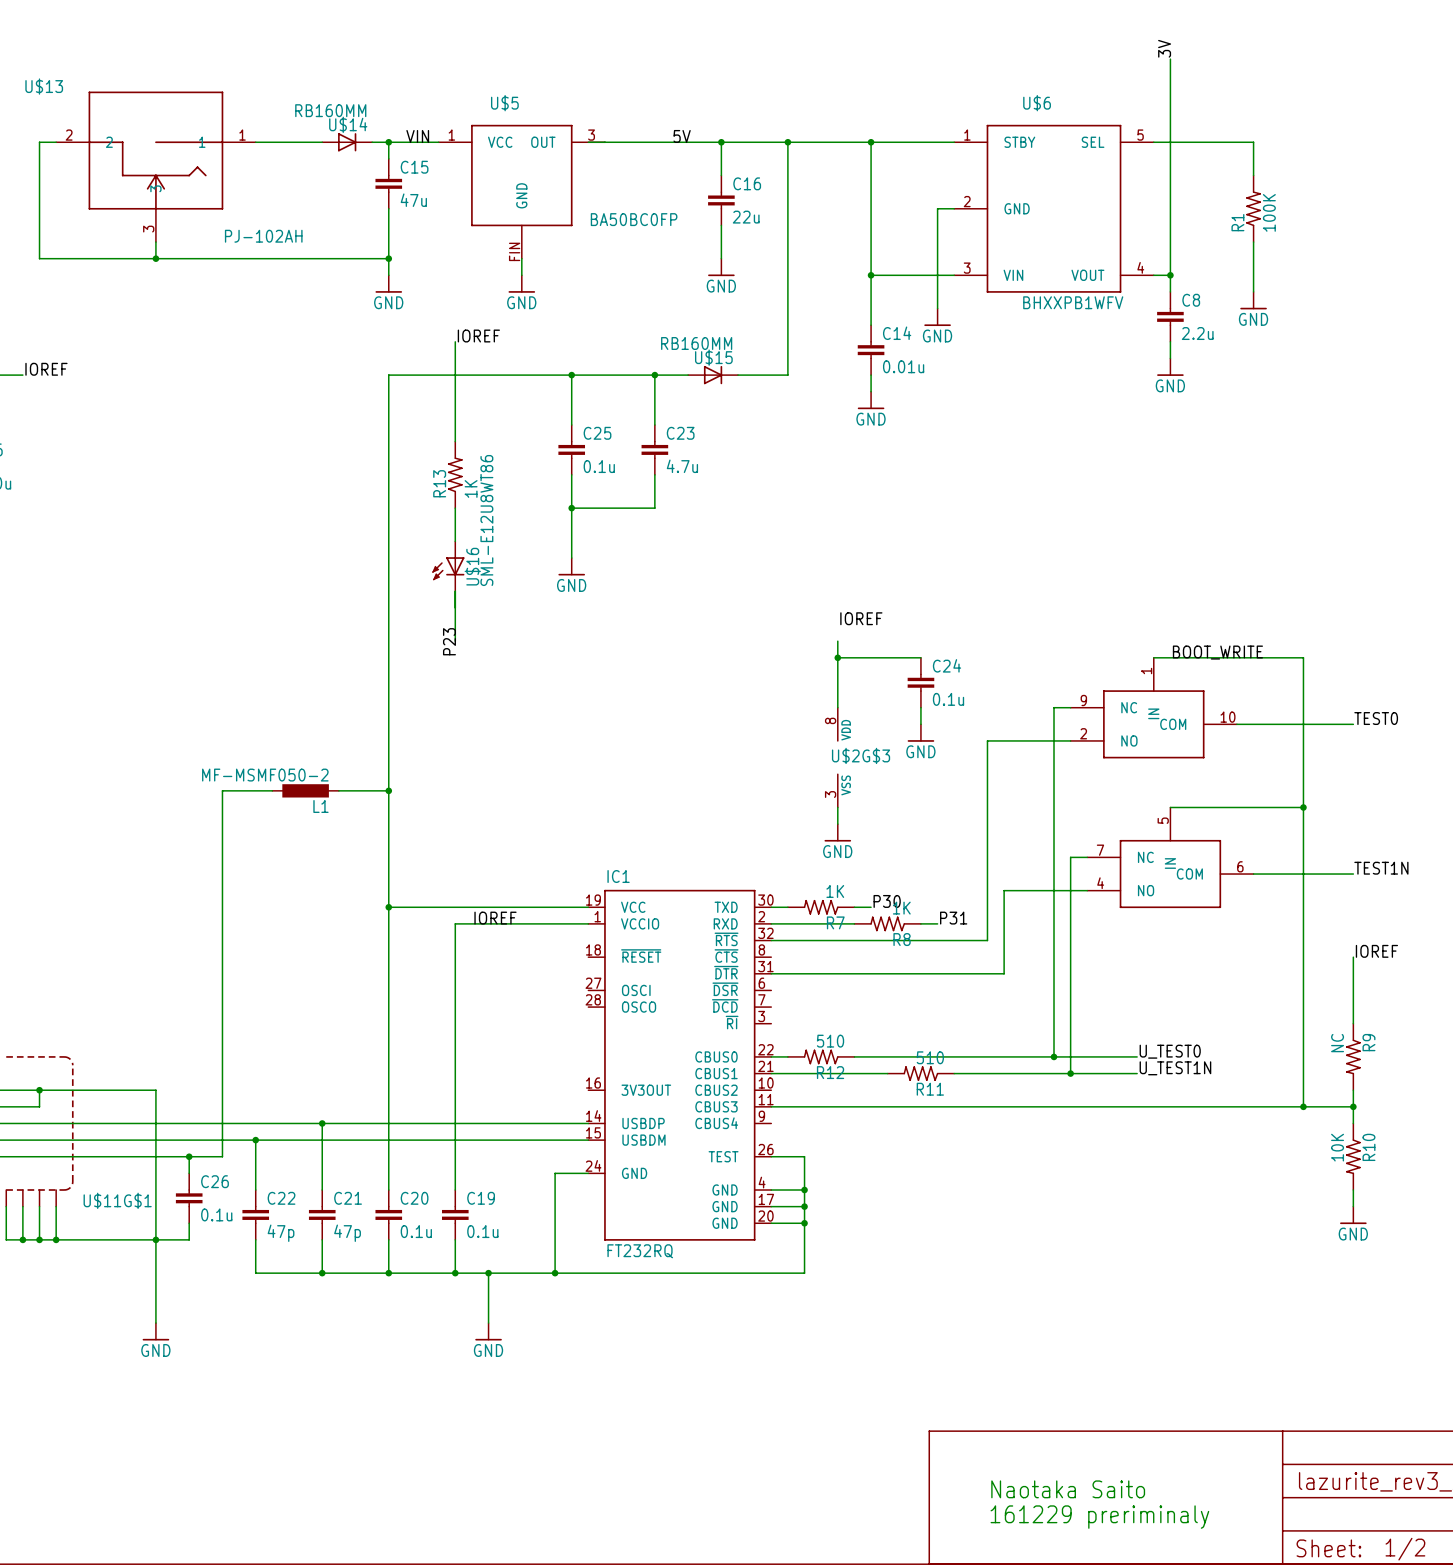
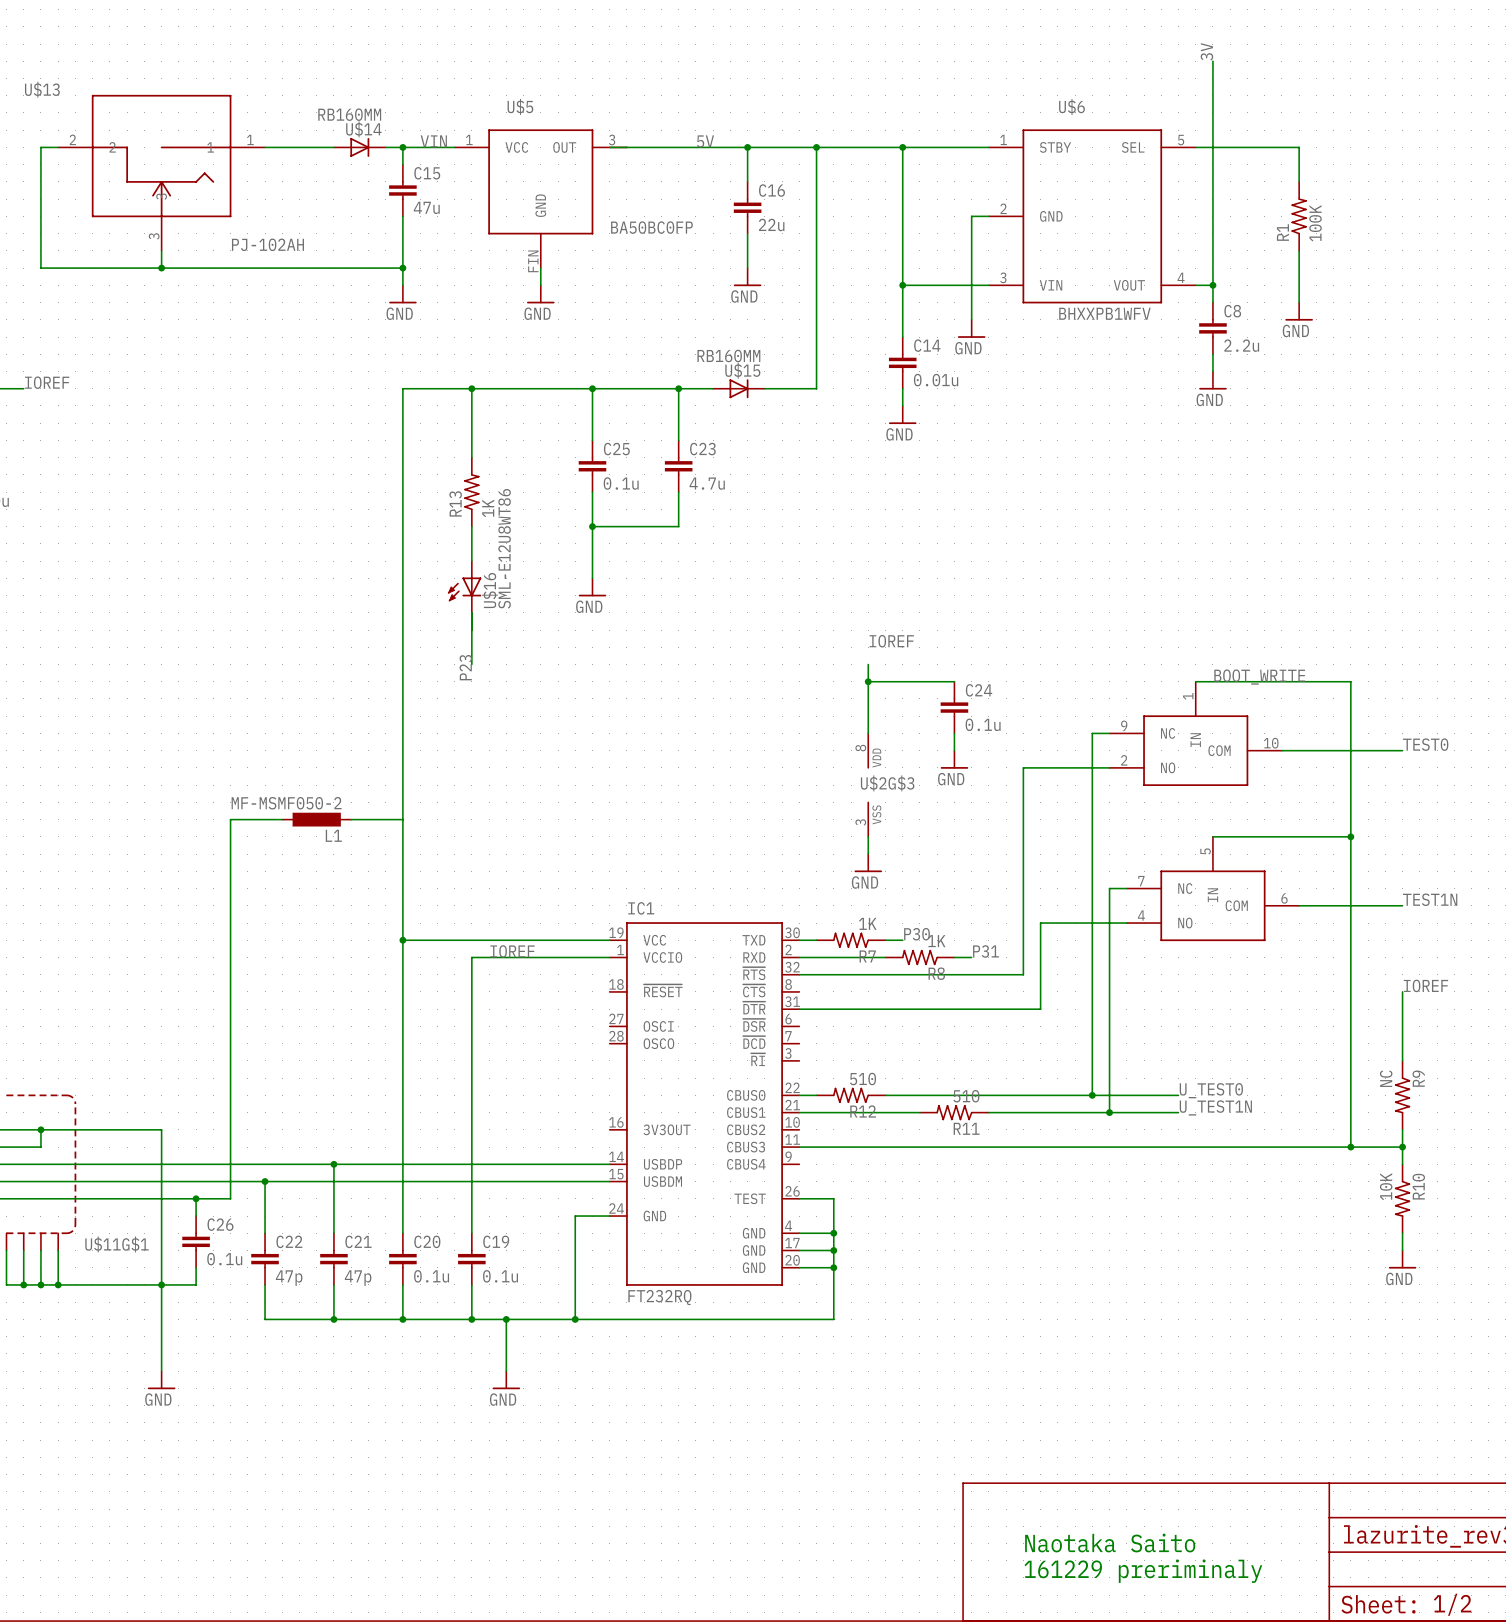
label: IOREF (478, 336) -> none
wire: (455, 341) (455, 375) -> none
junction: none -> (471, 388)
junction: (388, 790) -> none

